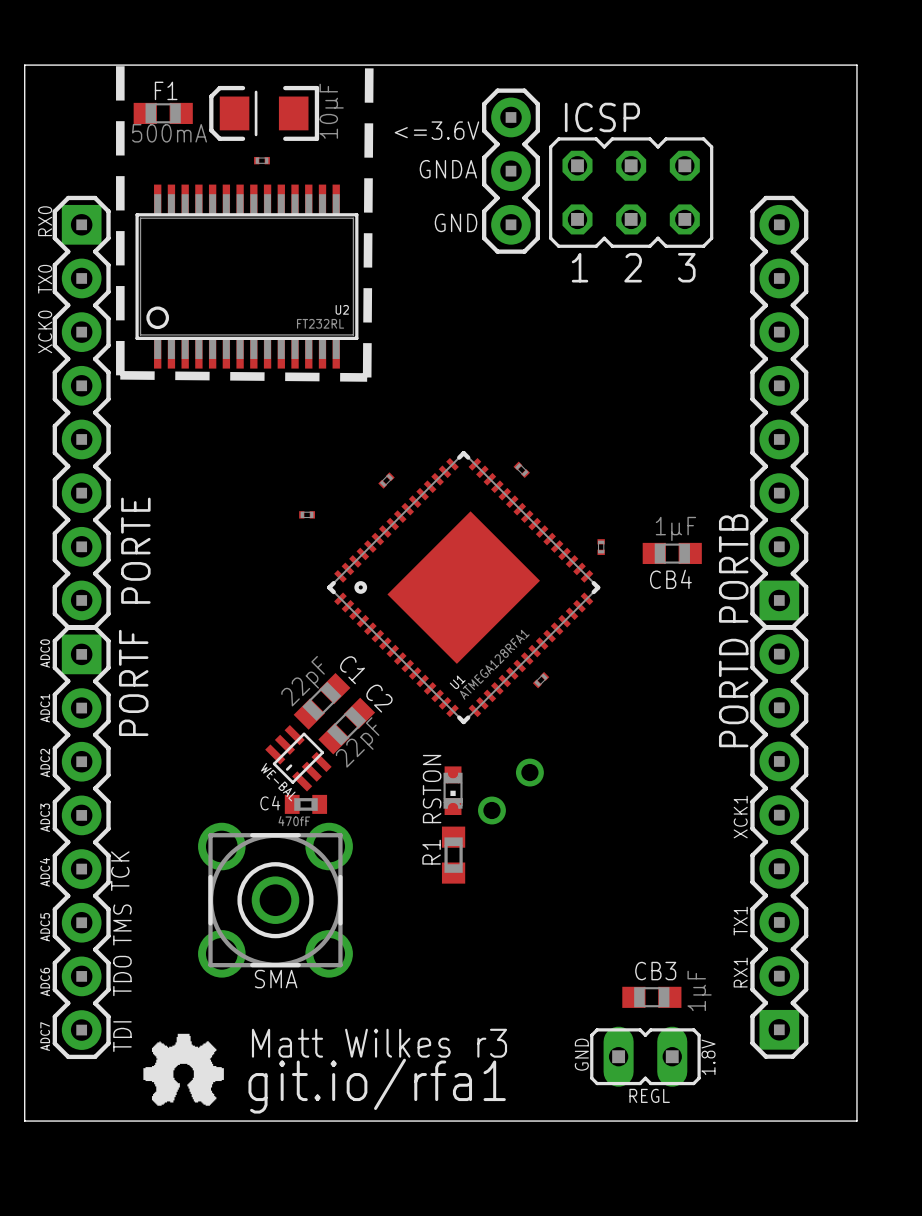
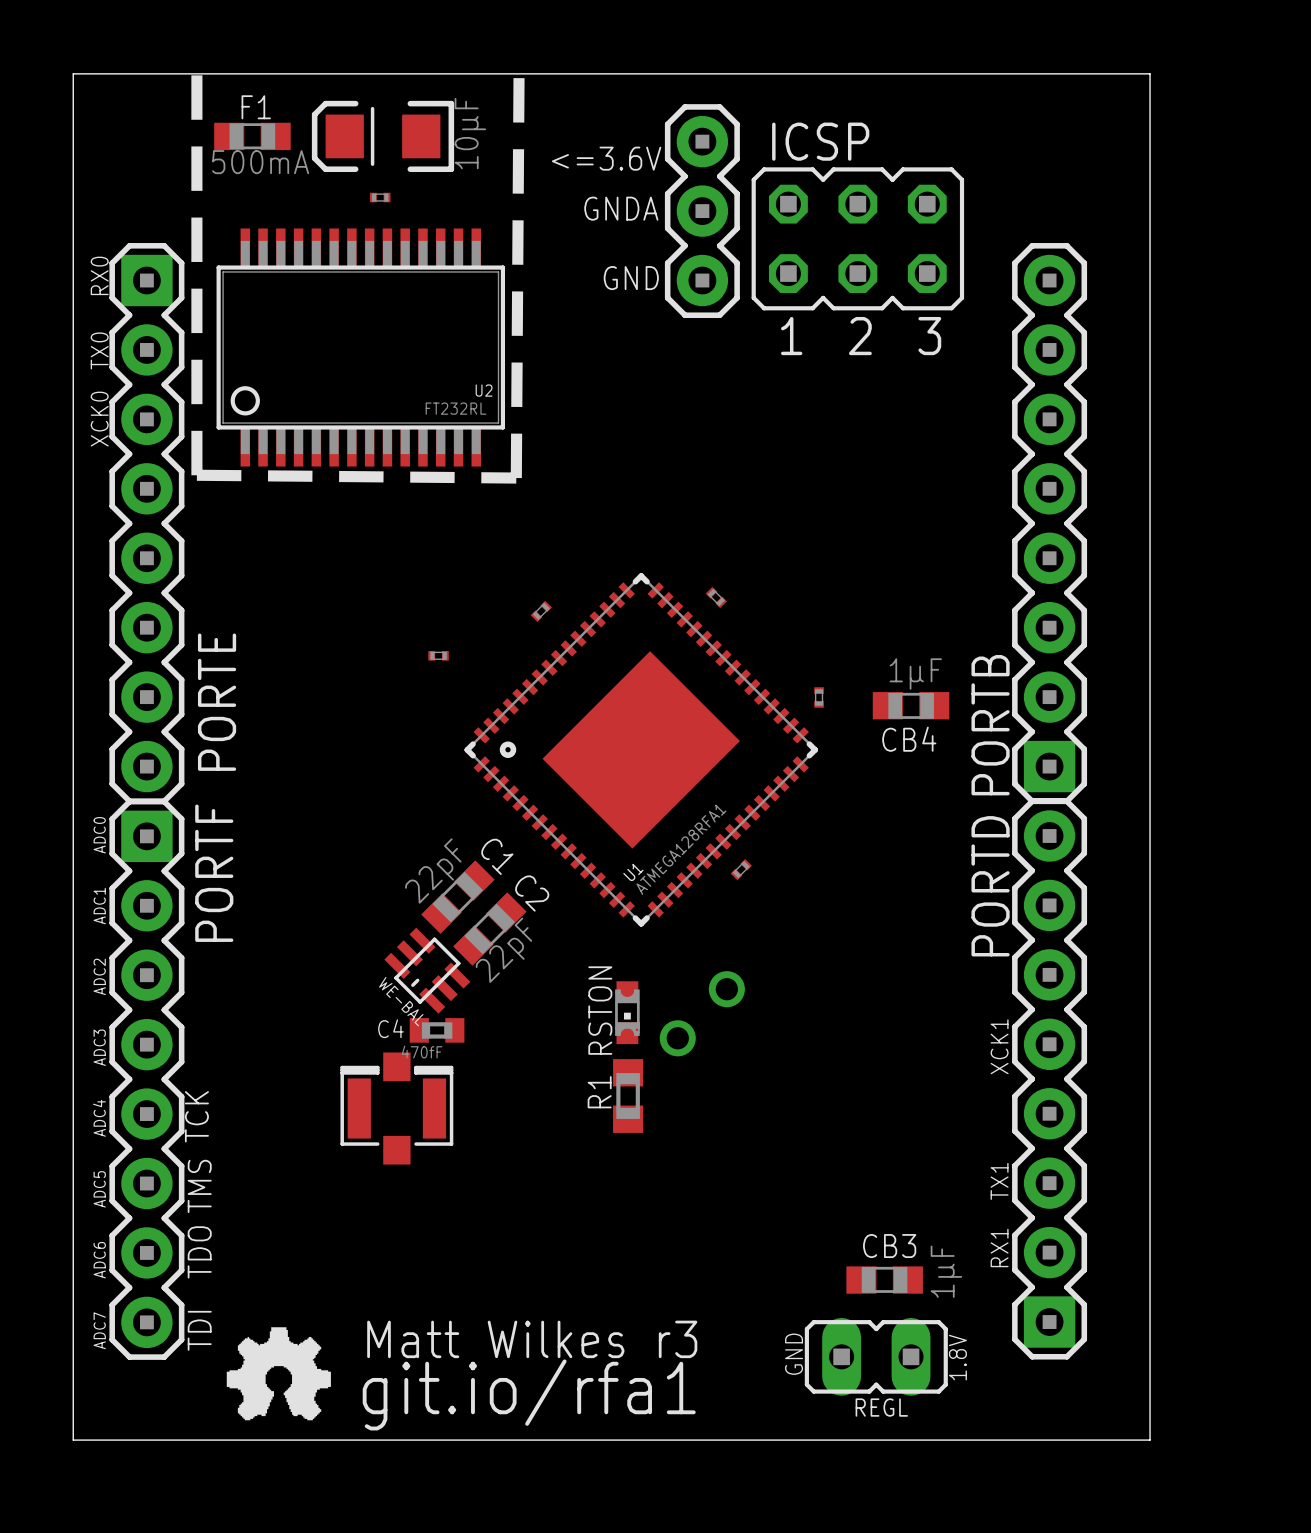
part: none -> (396, 1108)
SMA: (275, 900) -> none

